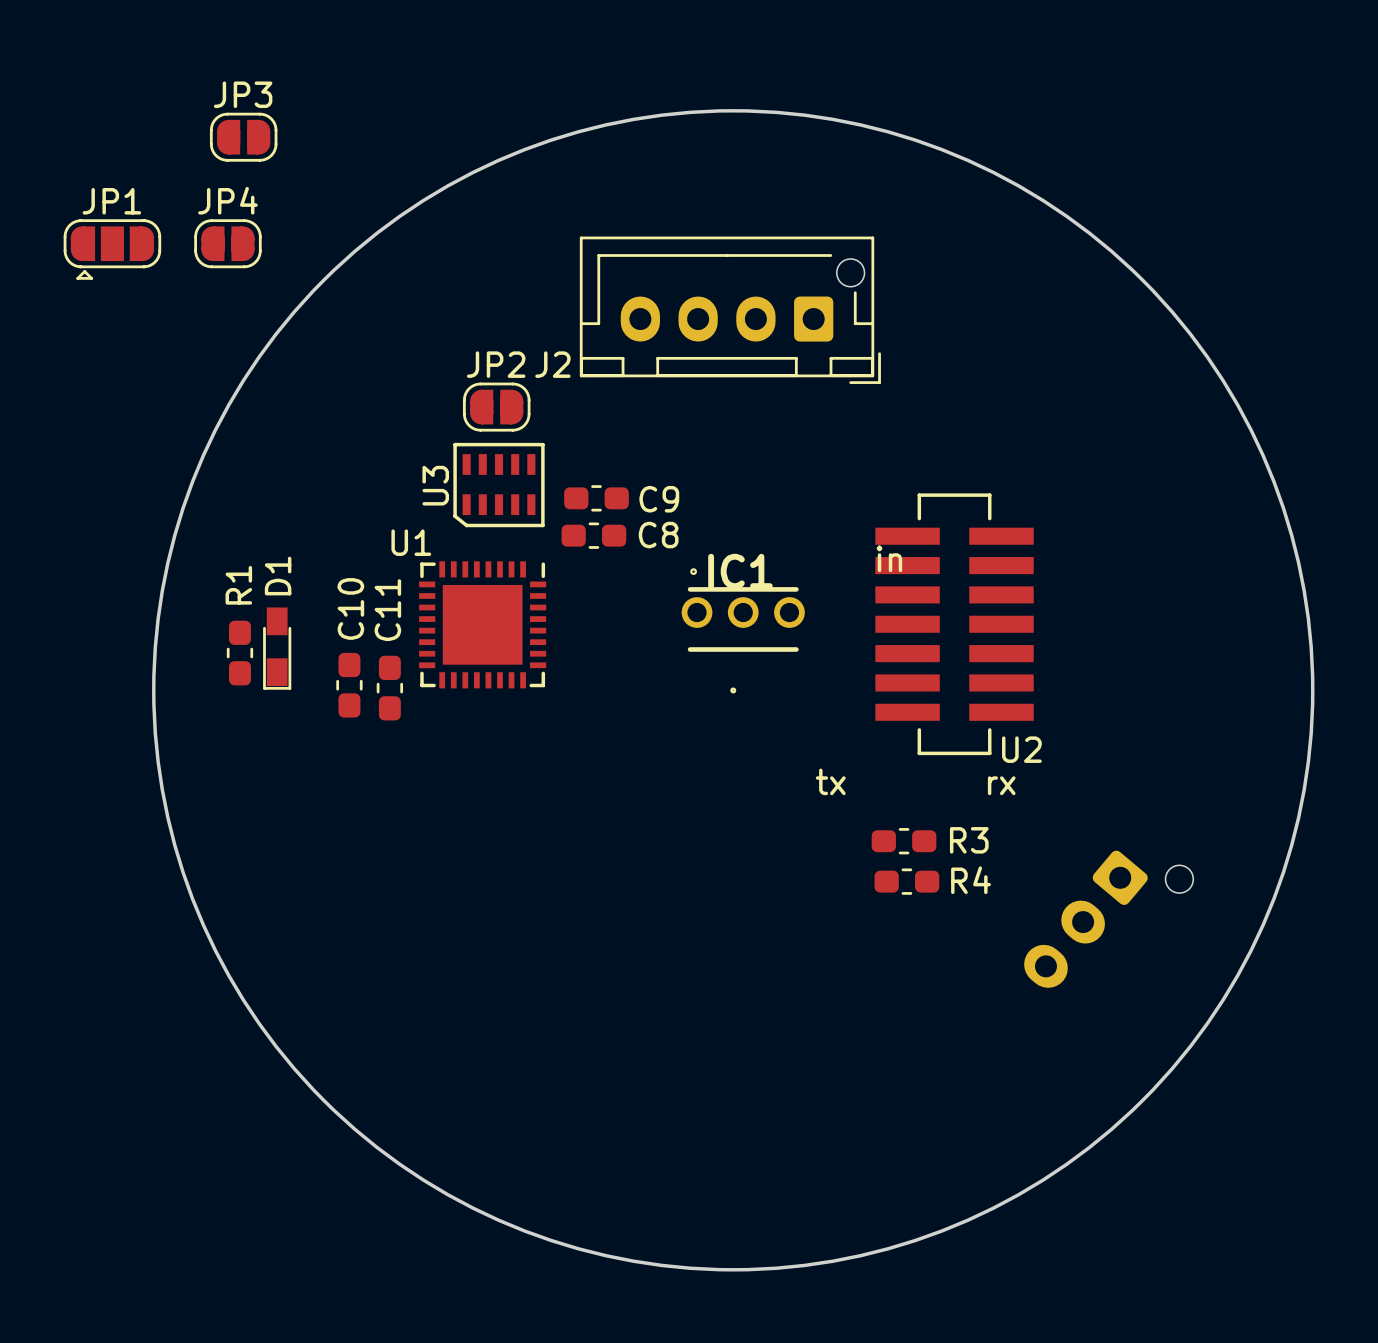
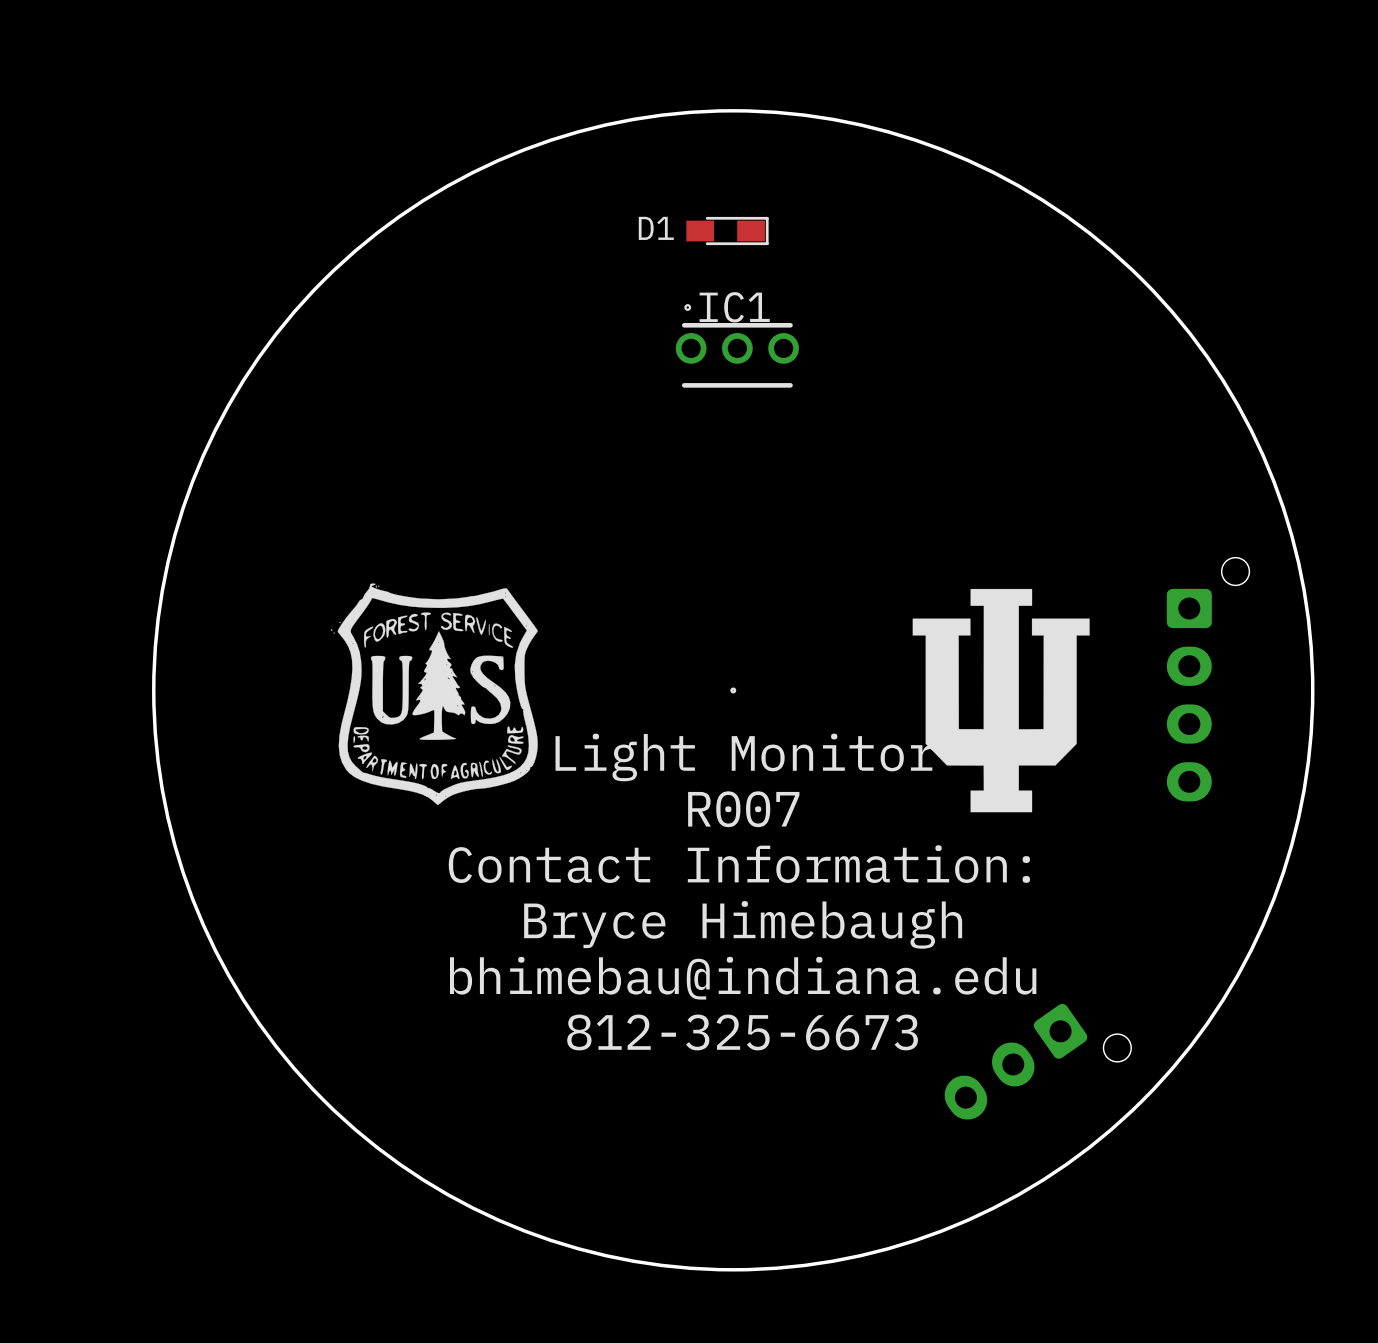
JP3: (243, 137) -> none
JP4: (227, 243) -> none
JP1: (112, 249) -> none
J2: (730, 310) -> none
JP2: (496, 407) -> none
U3: (498, 485) -> none
C9: (596, 498) -> none
C8: (593, 535) -> none
text: in (889, 558) -> none
drawing: none -> [331, 583, 538, 806]
drawing: none -> [912, 588, 1090, 813]
IC1 position: (743, 610) -> (737, 345)
U1: (482, 624) -> none
U2: (954, 624) -> none
D1 rotation: 0° (277, 648) -> 90° counterclockwise (727, 231)
D1 position: (277, 648) -> (727, 231)
R1: (239, 653) -> none
part: none -> (1208, 679)
C10: (349, 685) -> none
C11: (389, 688) -> none
text: none -> Light Monitor (745, 757)
text: tx (830, 781) -> none
text: rx (1001, 785) -> none
text: none -> R007 (743, 809)
R3: (904, 841) -> none
text: none -> Contact Information: (739, 864)
R4: (906, 881) -> none
part: (1108, 919) -> none
text: none -> Bryce Himebaugh (743, 924)
text: none -> bhimebau@indiana.edu (743, 978)
text: none -> 812-325-6673 (742, 1032)
part: none -> (1037, 1061)

